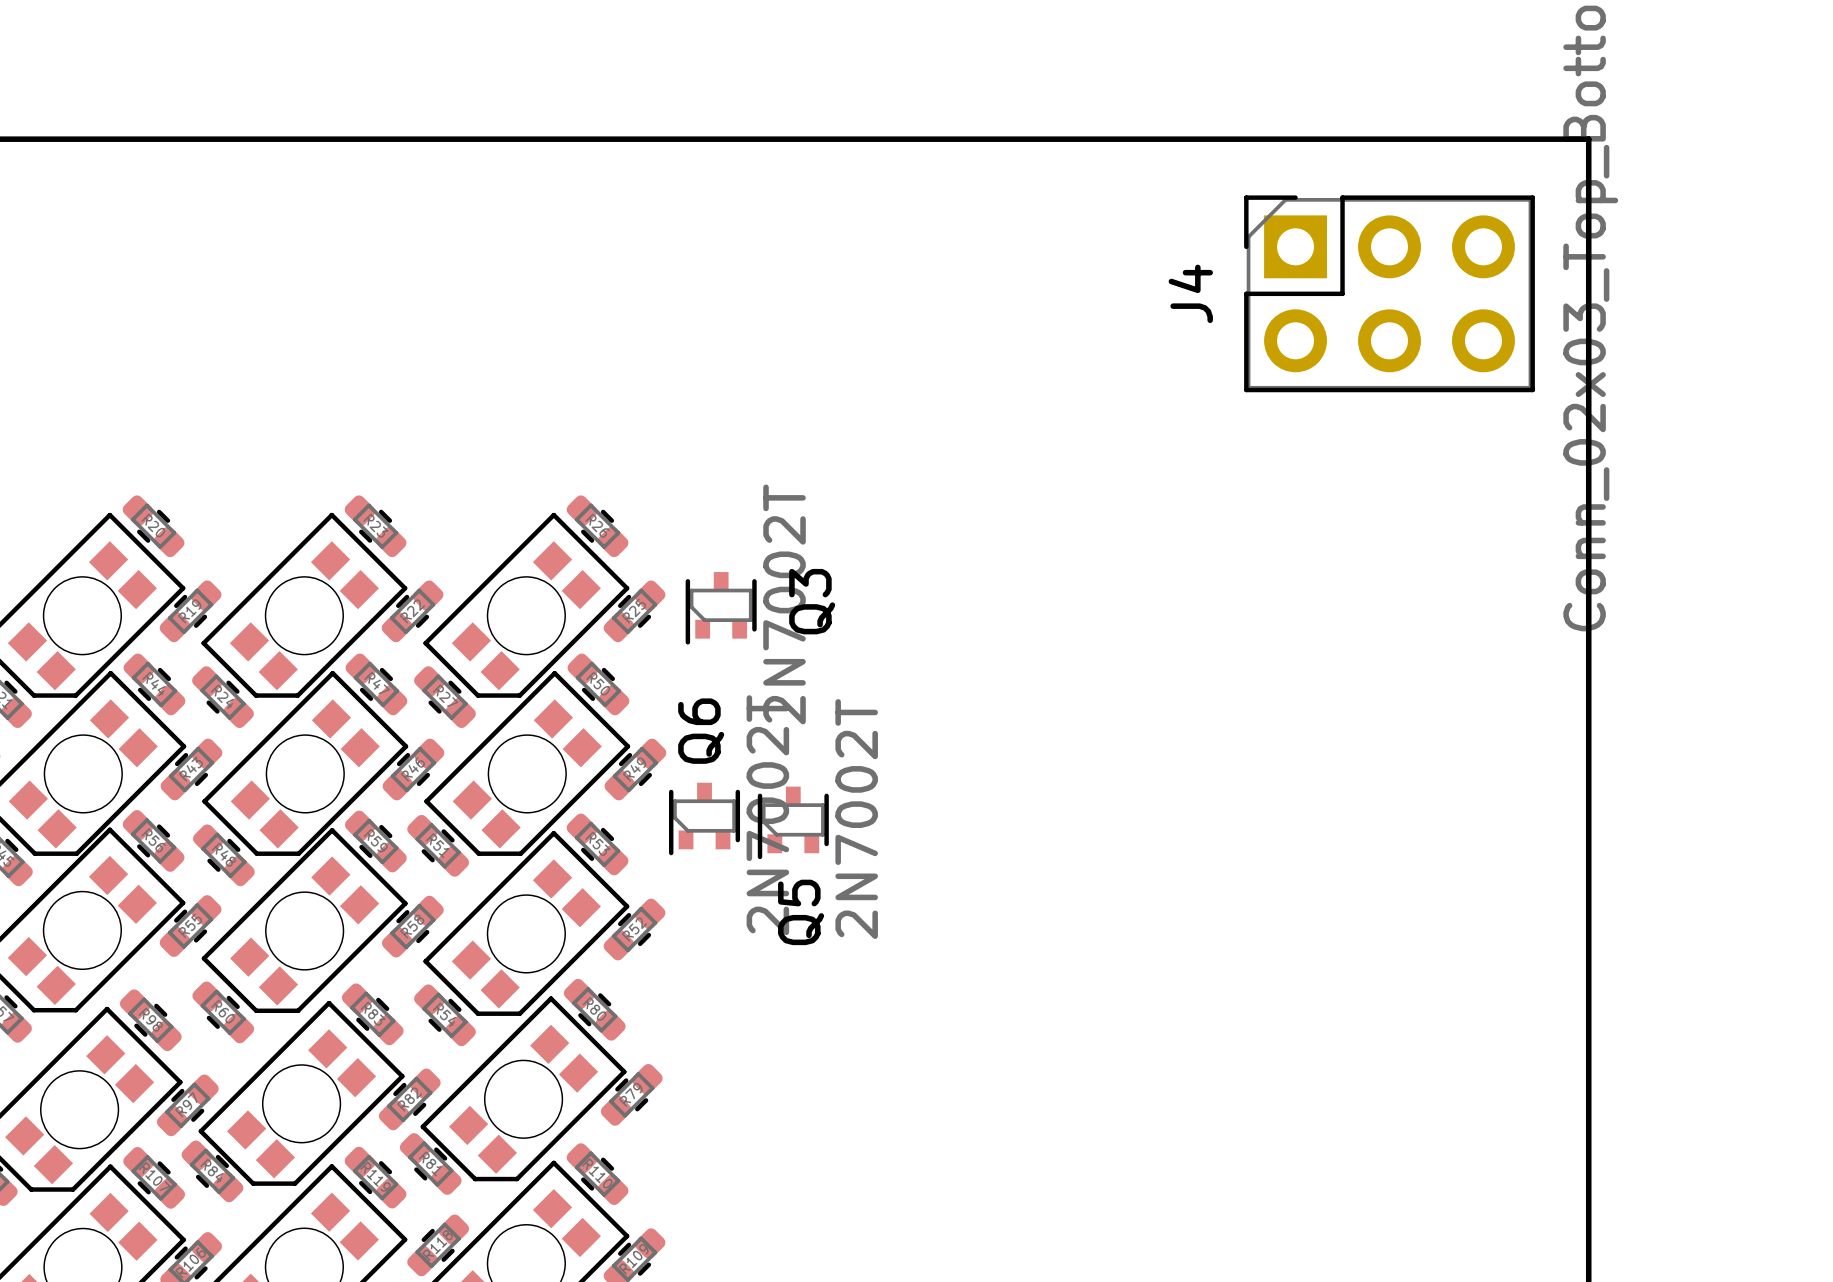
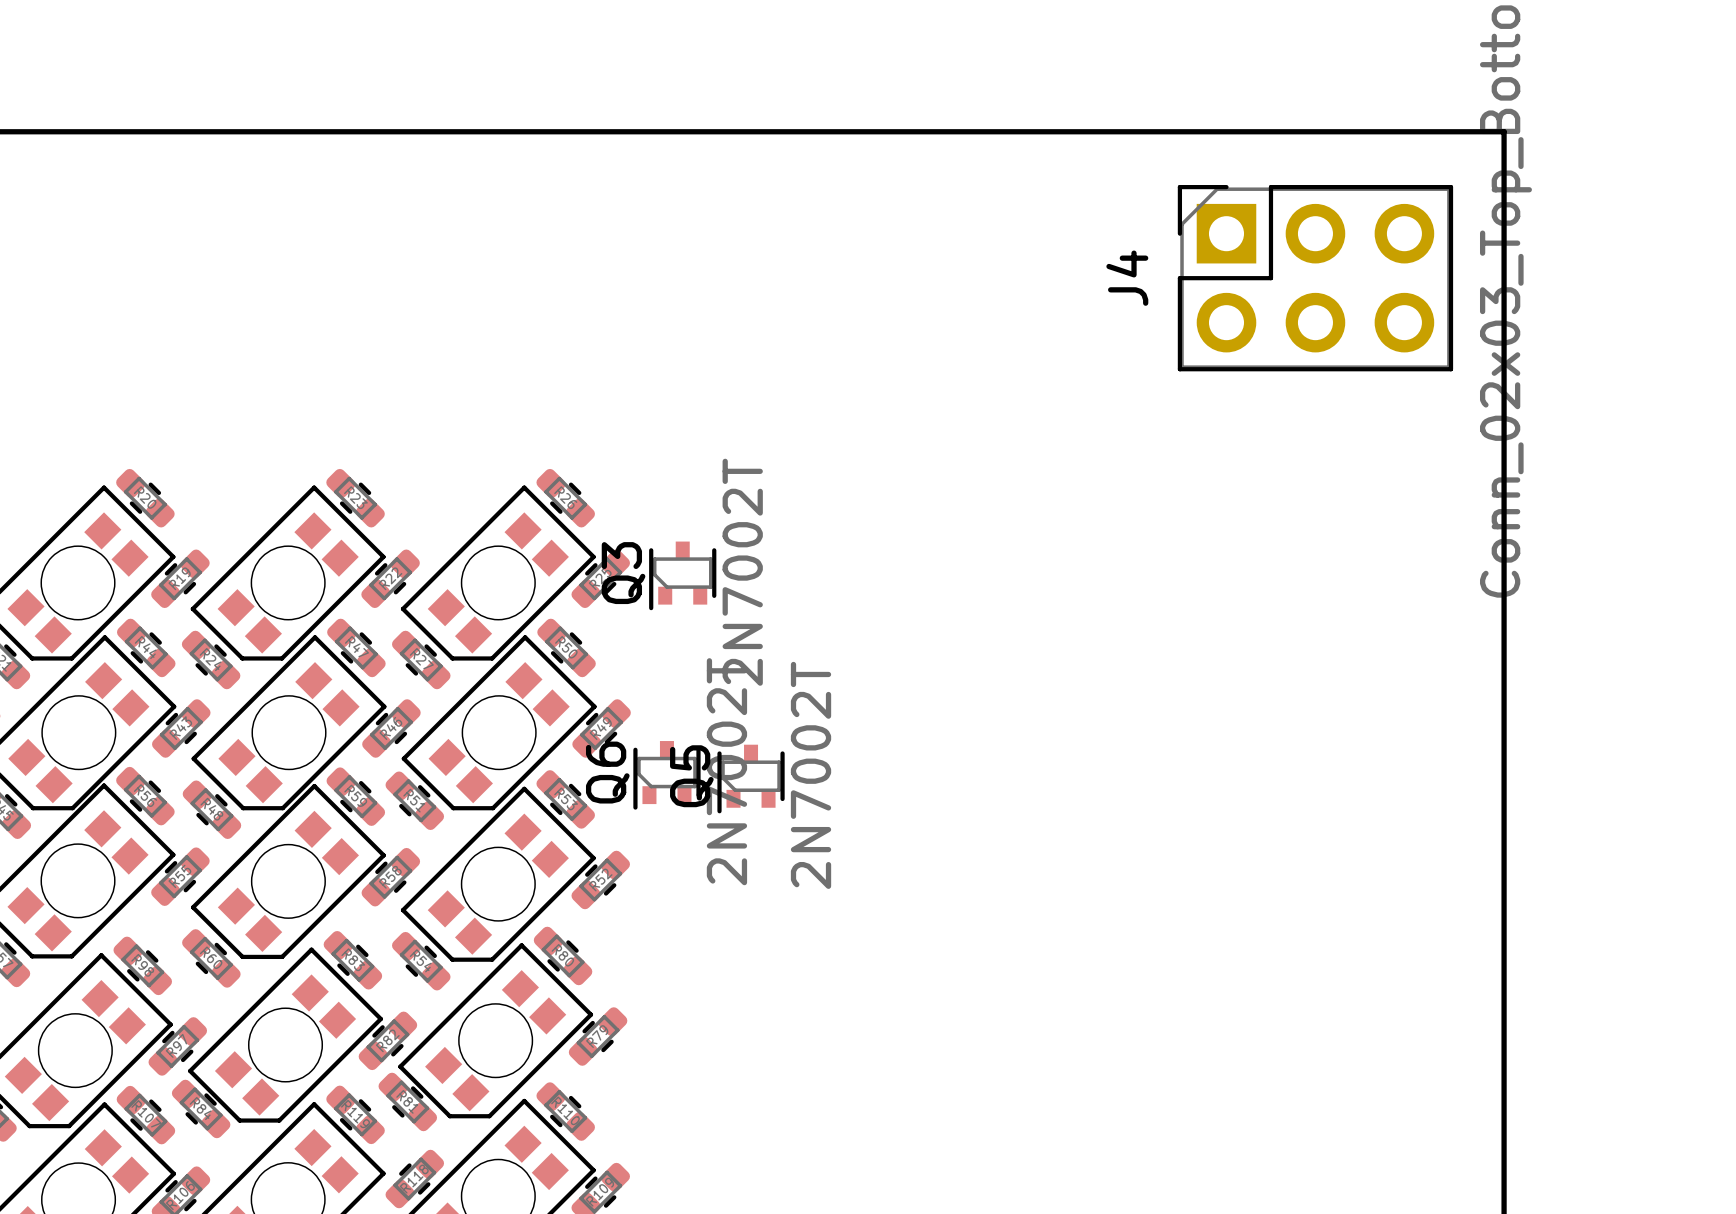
Q3 name position: Q3 (812, 601) -> Q3 (623, 573)
Q6 name position: Q6 (701, 731) -> Q6 (607, 772)
Q5 name position: Q5 (801, 912) -> Q5 (691, 776)

